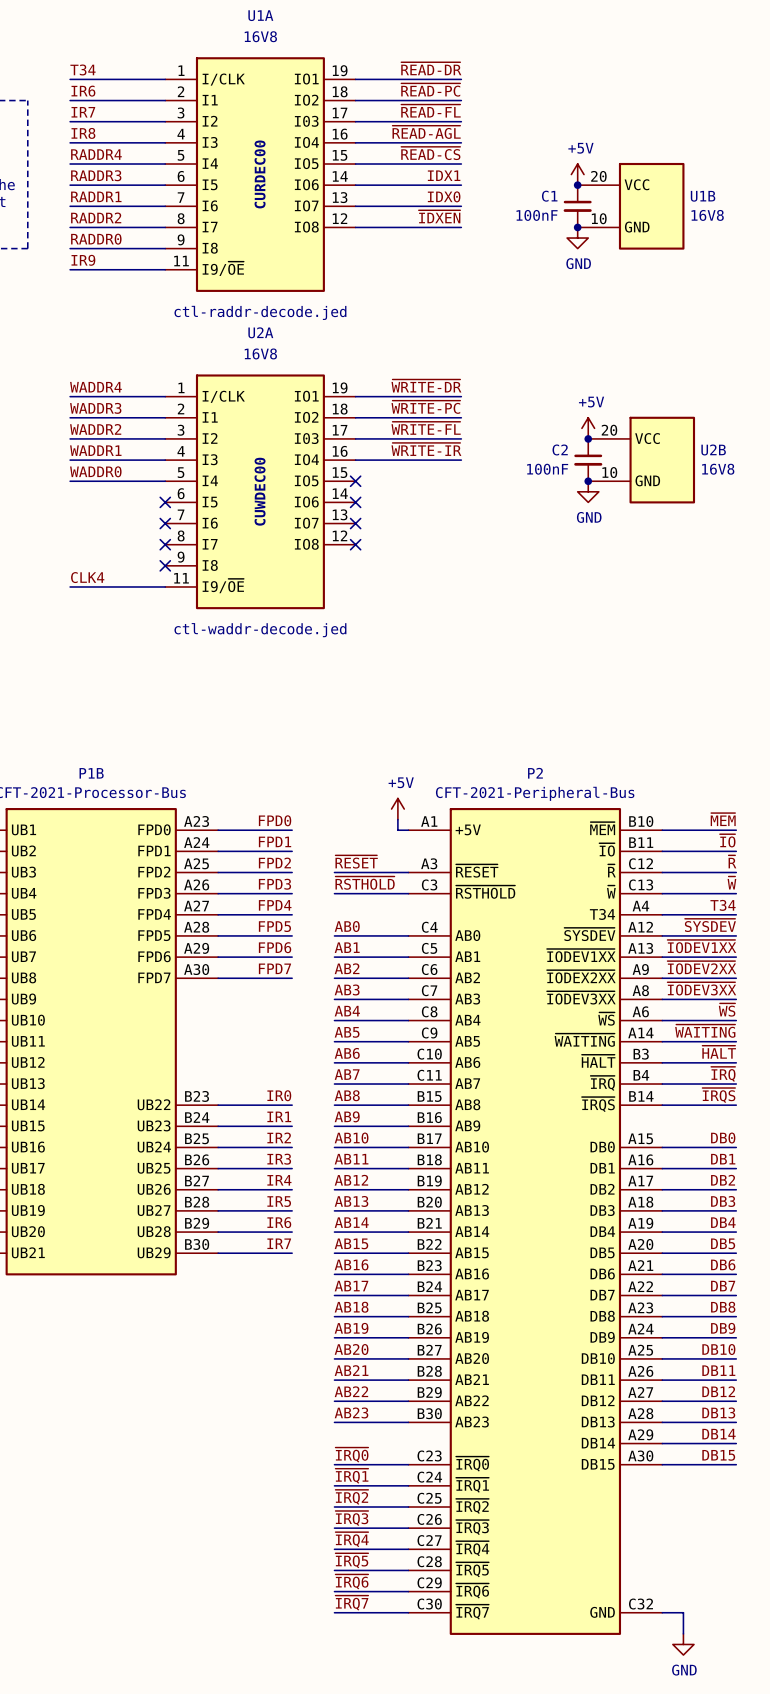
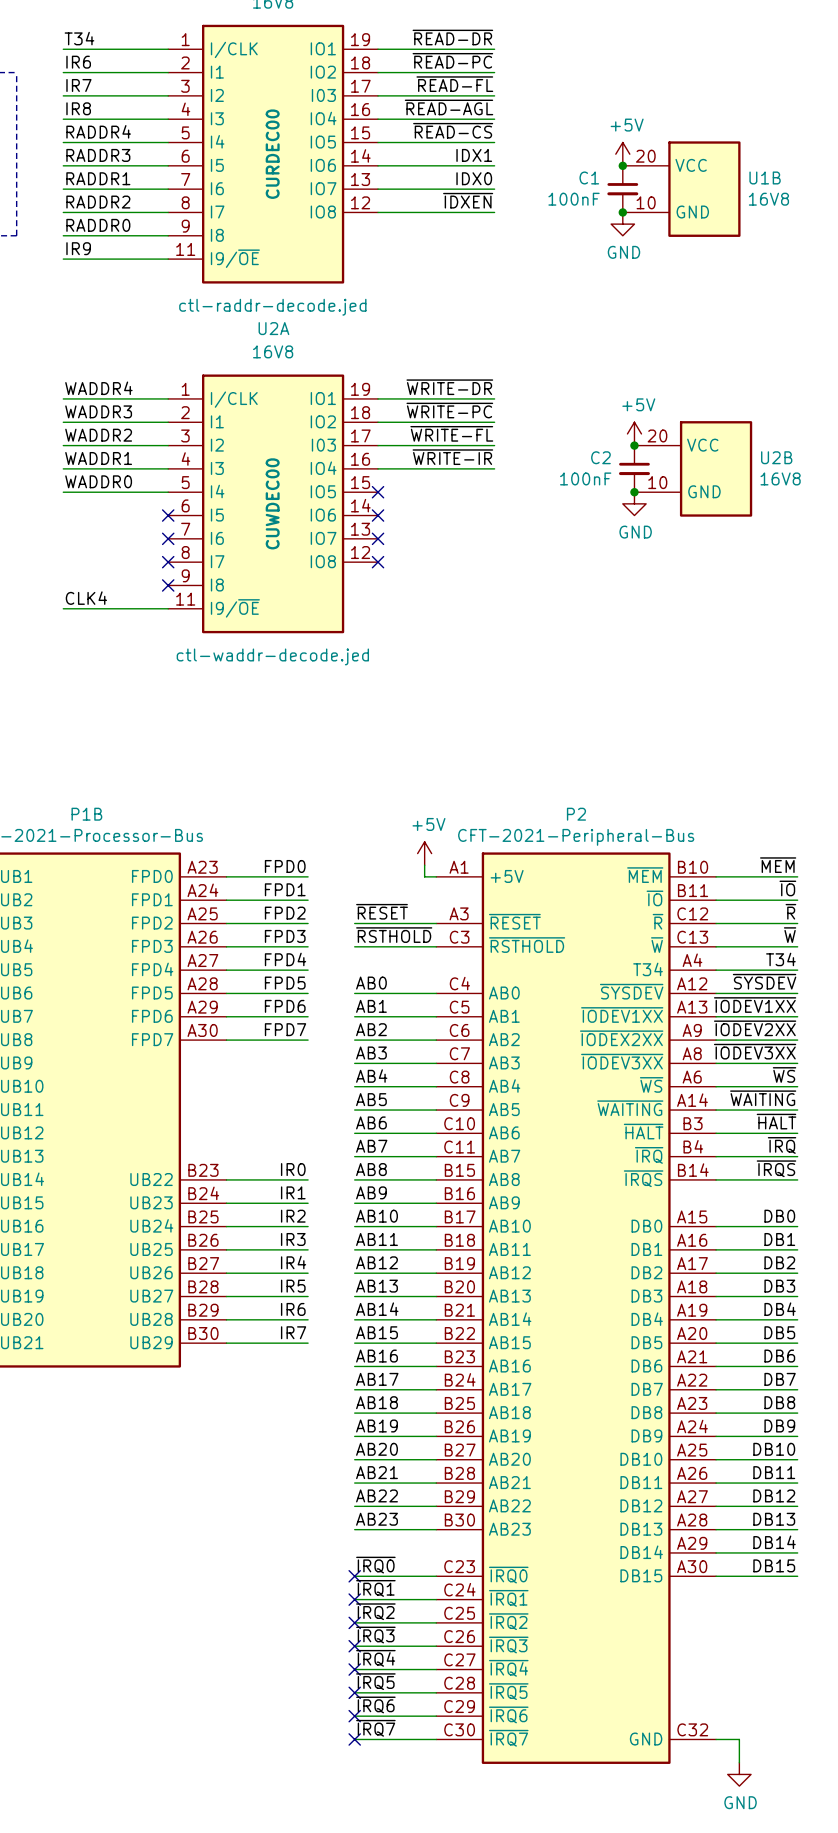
no-connect mark: none -> (354, 1576)
no-connect mark: none -> (354, 1599)
no-connect mark: none -> (354, 1622)
no-connect mark: none -> (354, 1646)
no-connect mark: none -> (354, 1669)
no-connect mark: none -> (354, 1692)
no-connect mark: none -> (354, 1716)
no-connect mark: none -> (354, 1739)

